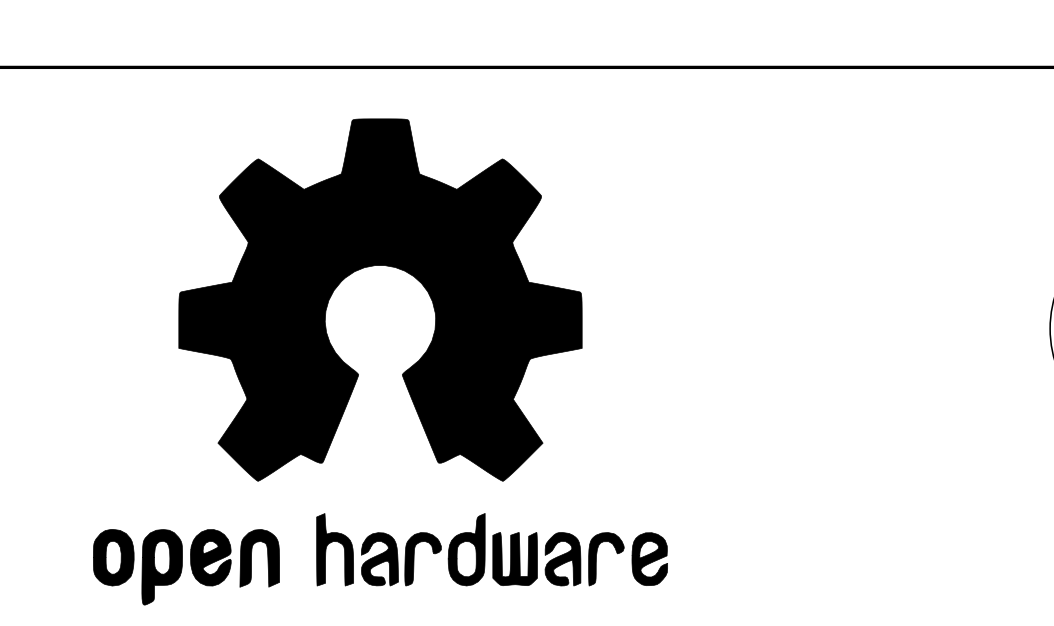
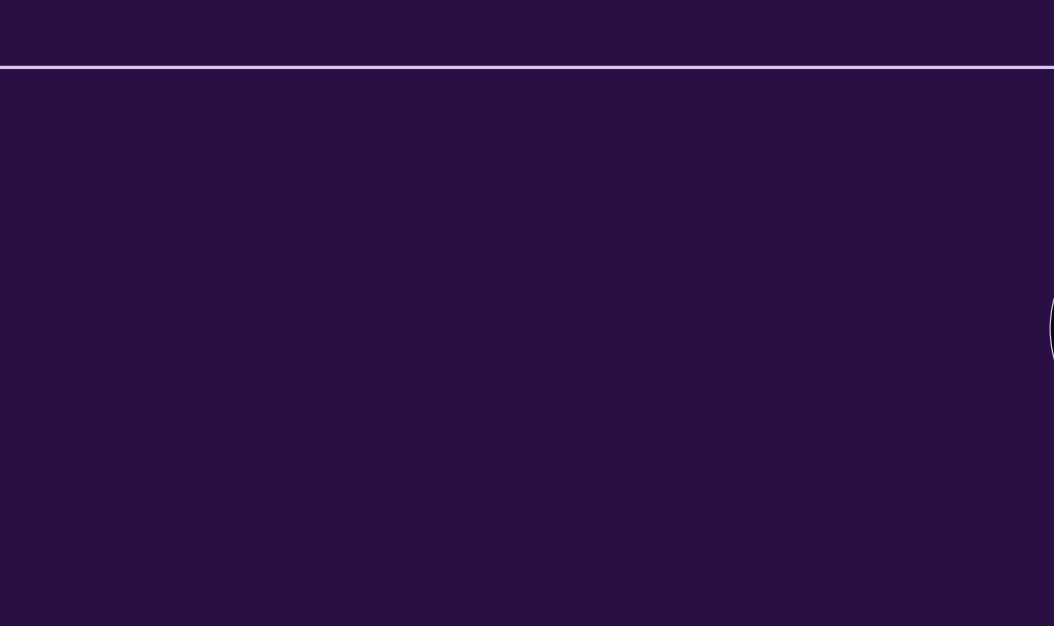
drawing: [92, 118, 669, 606] -> none

